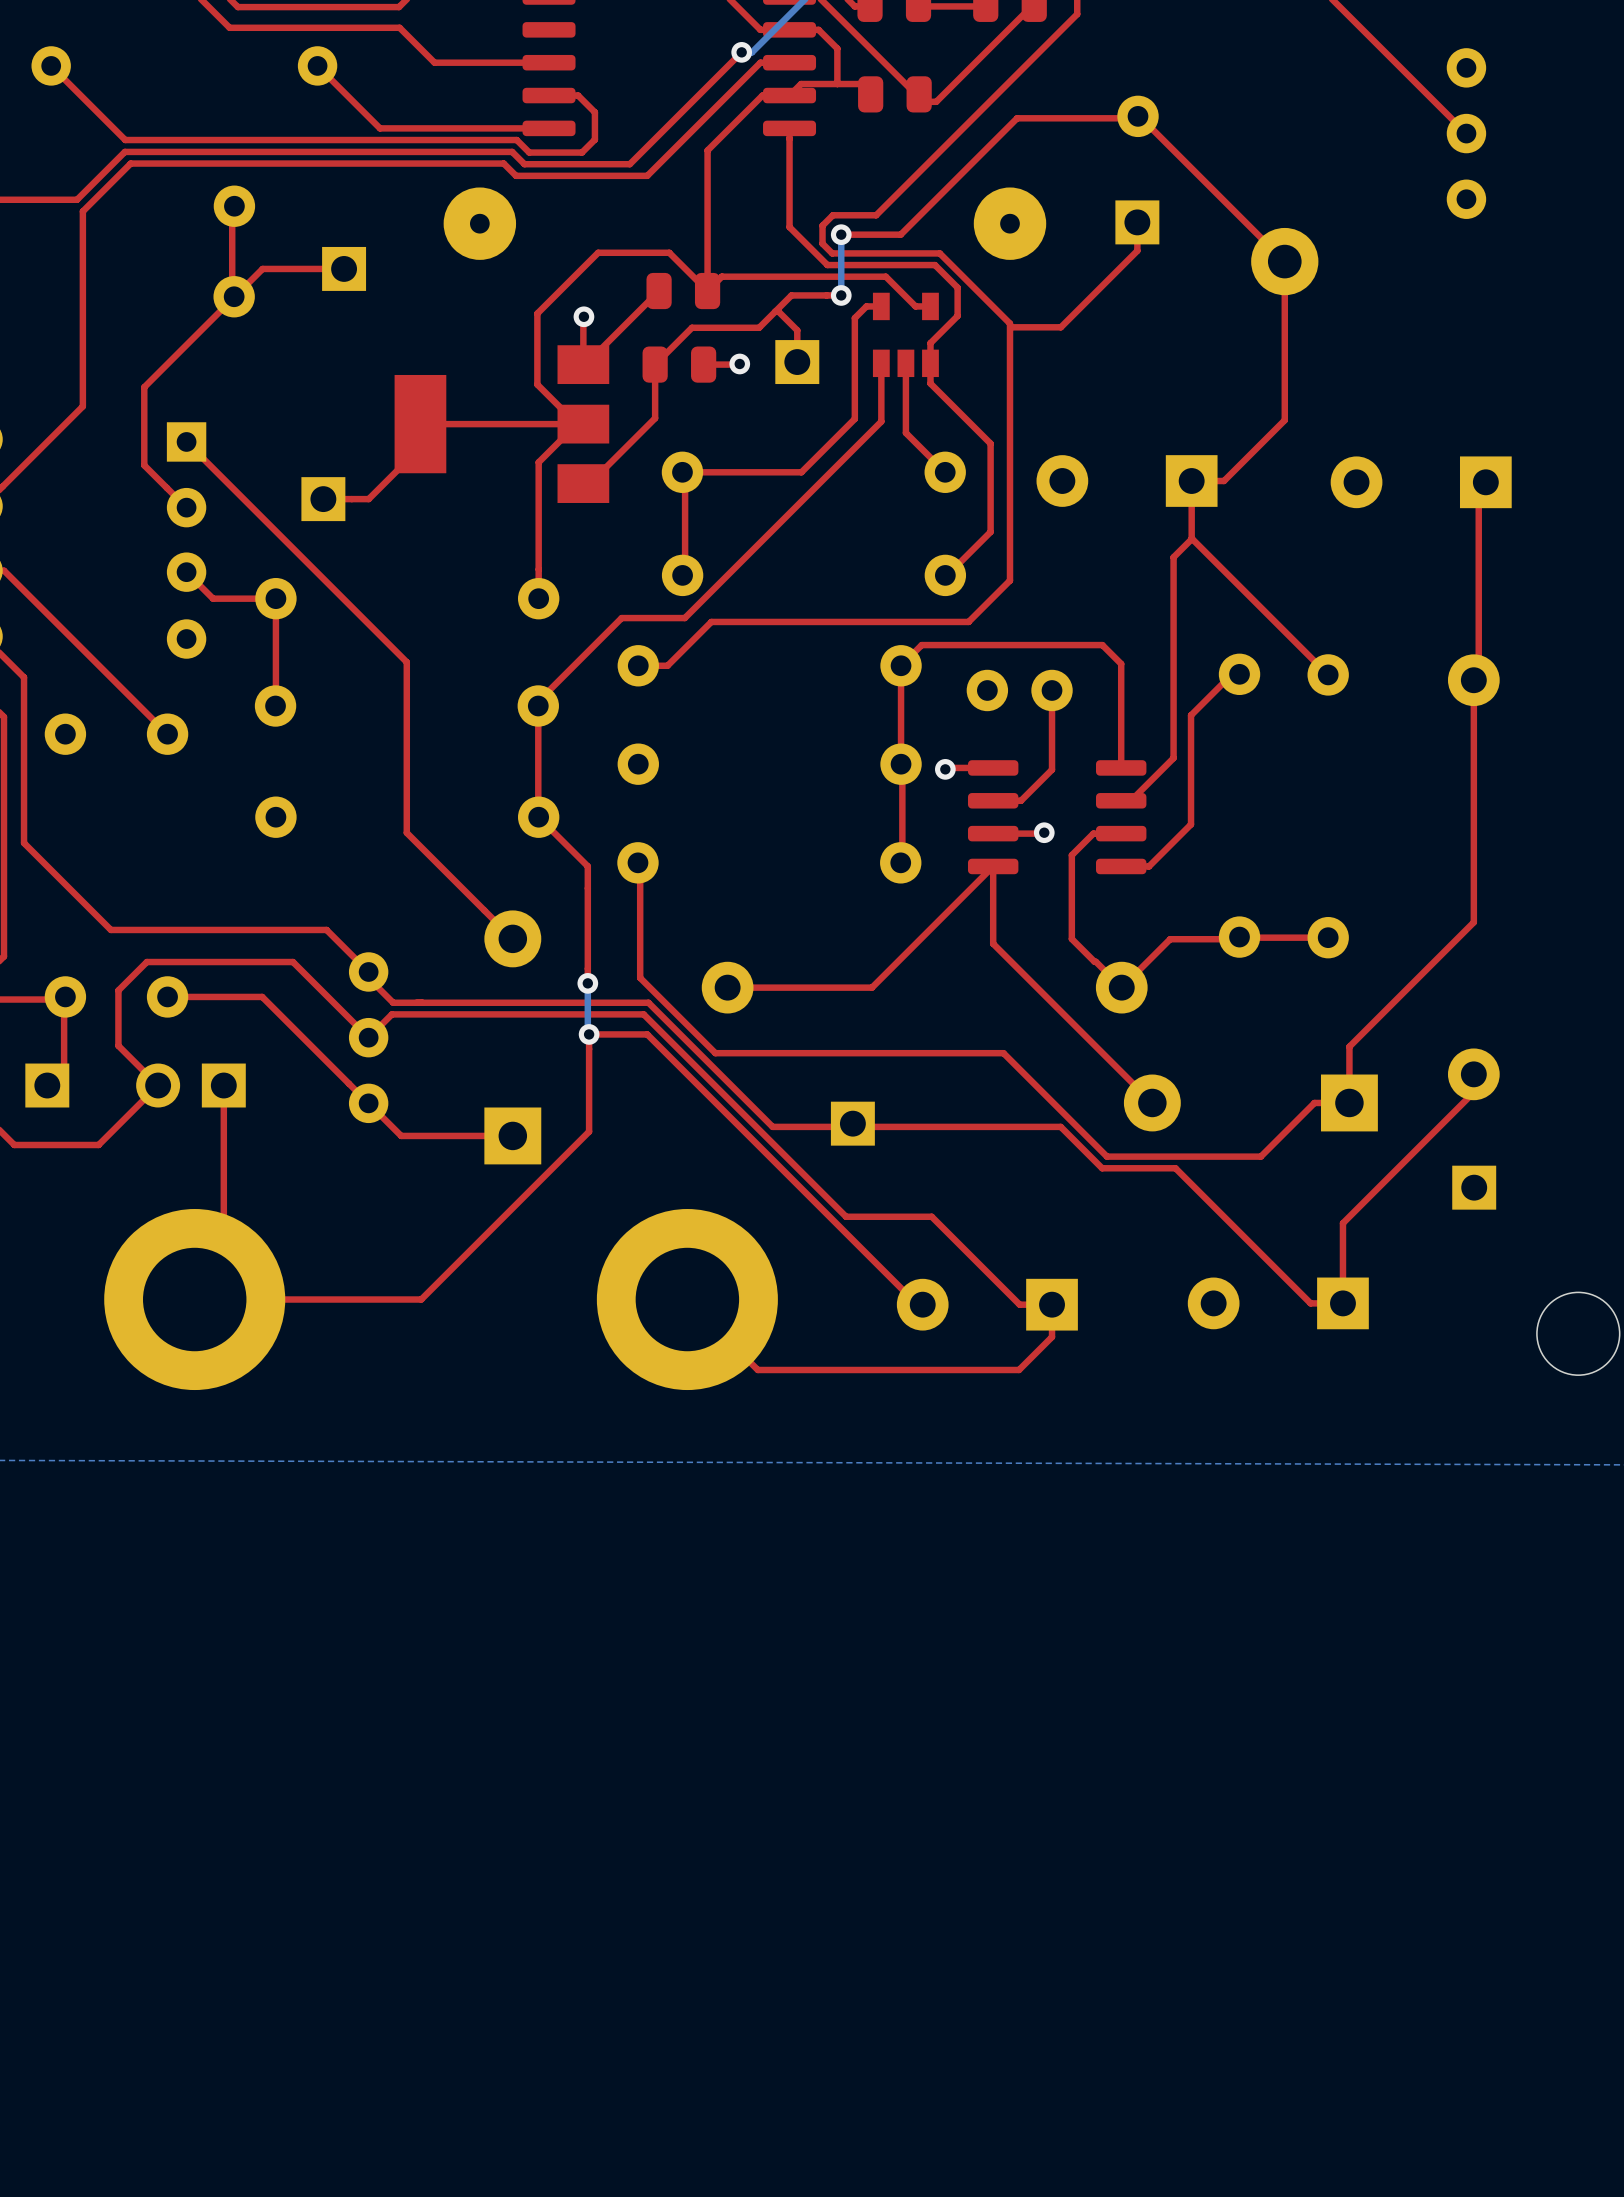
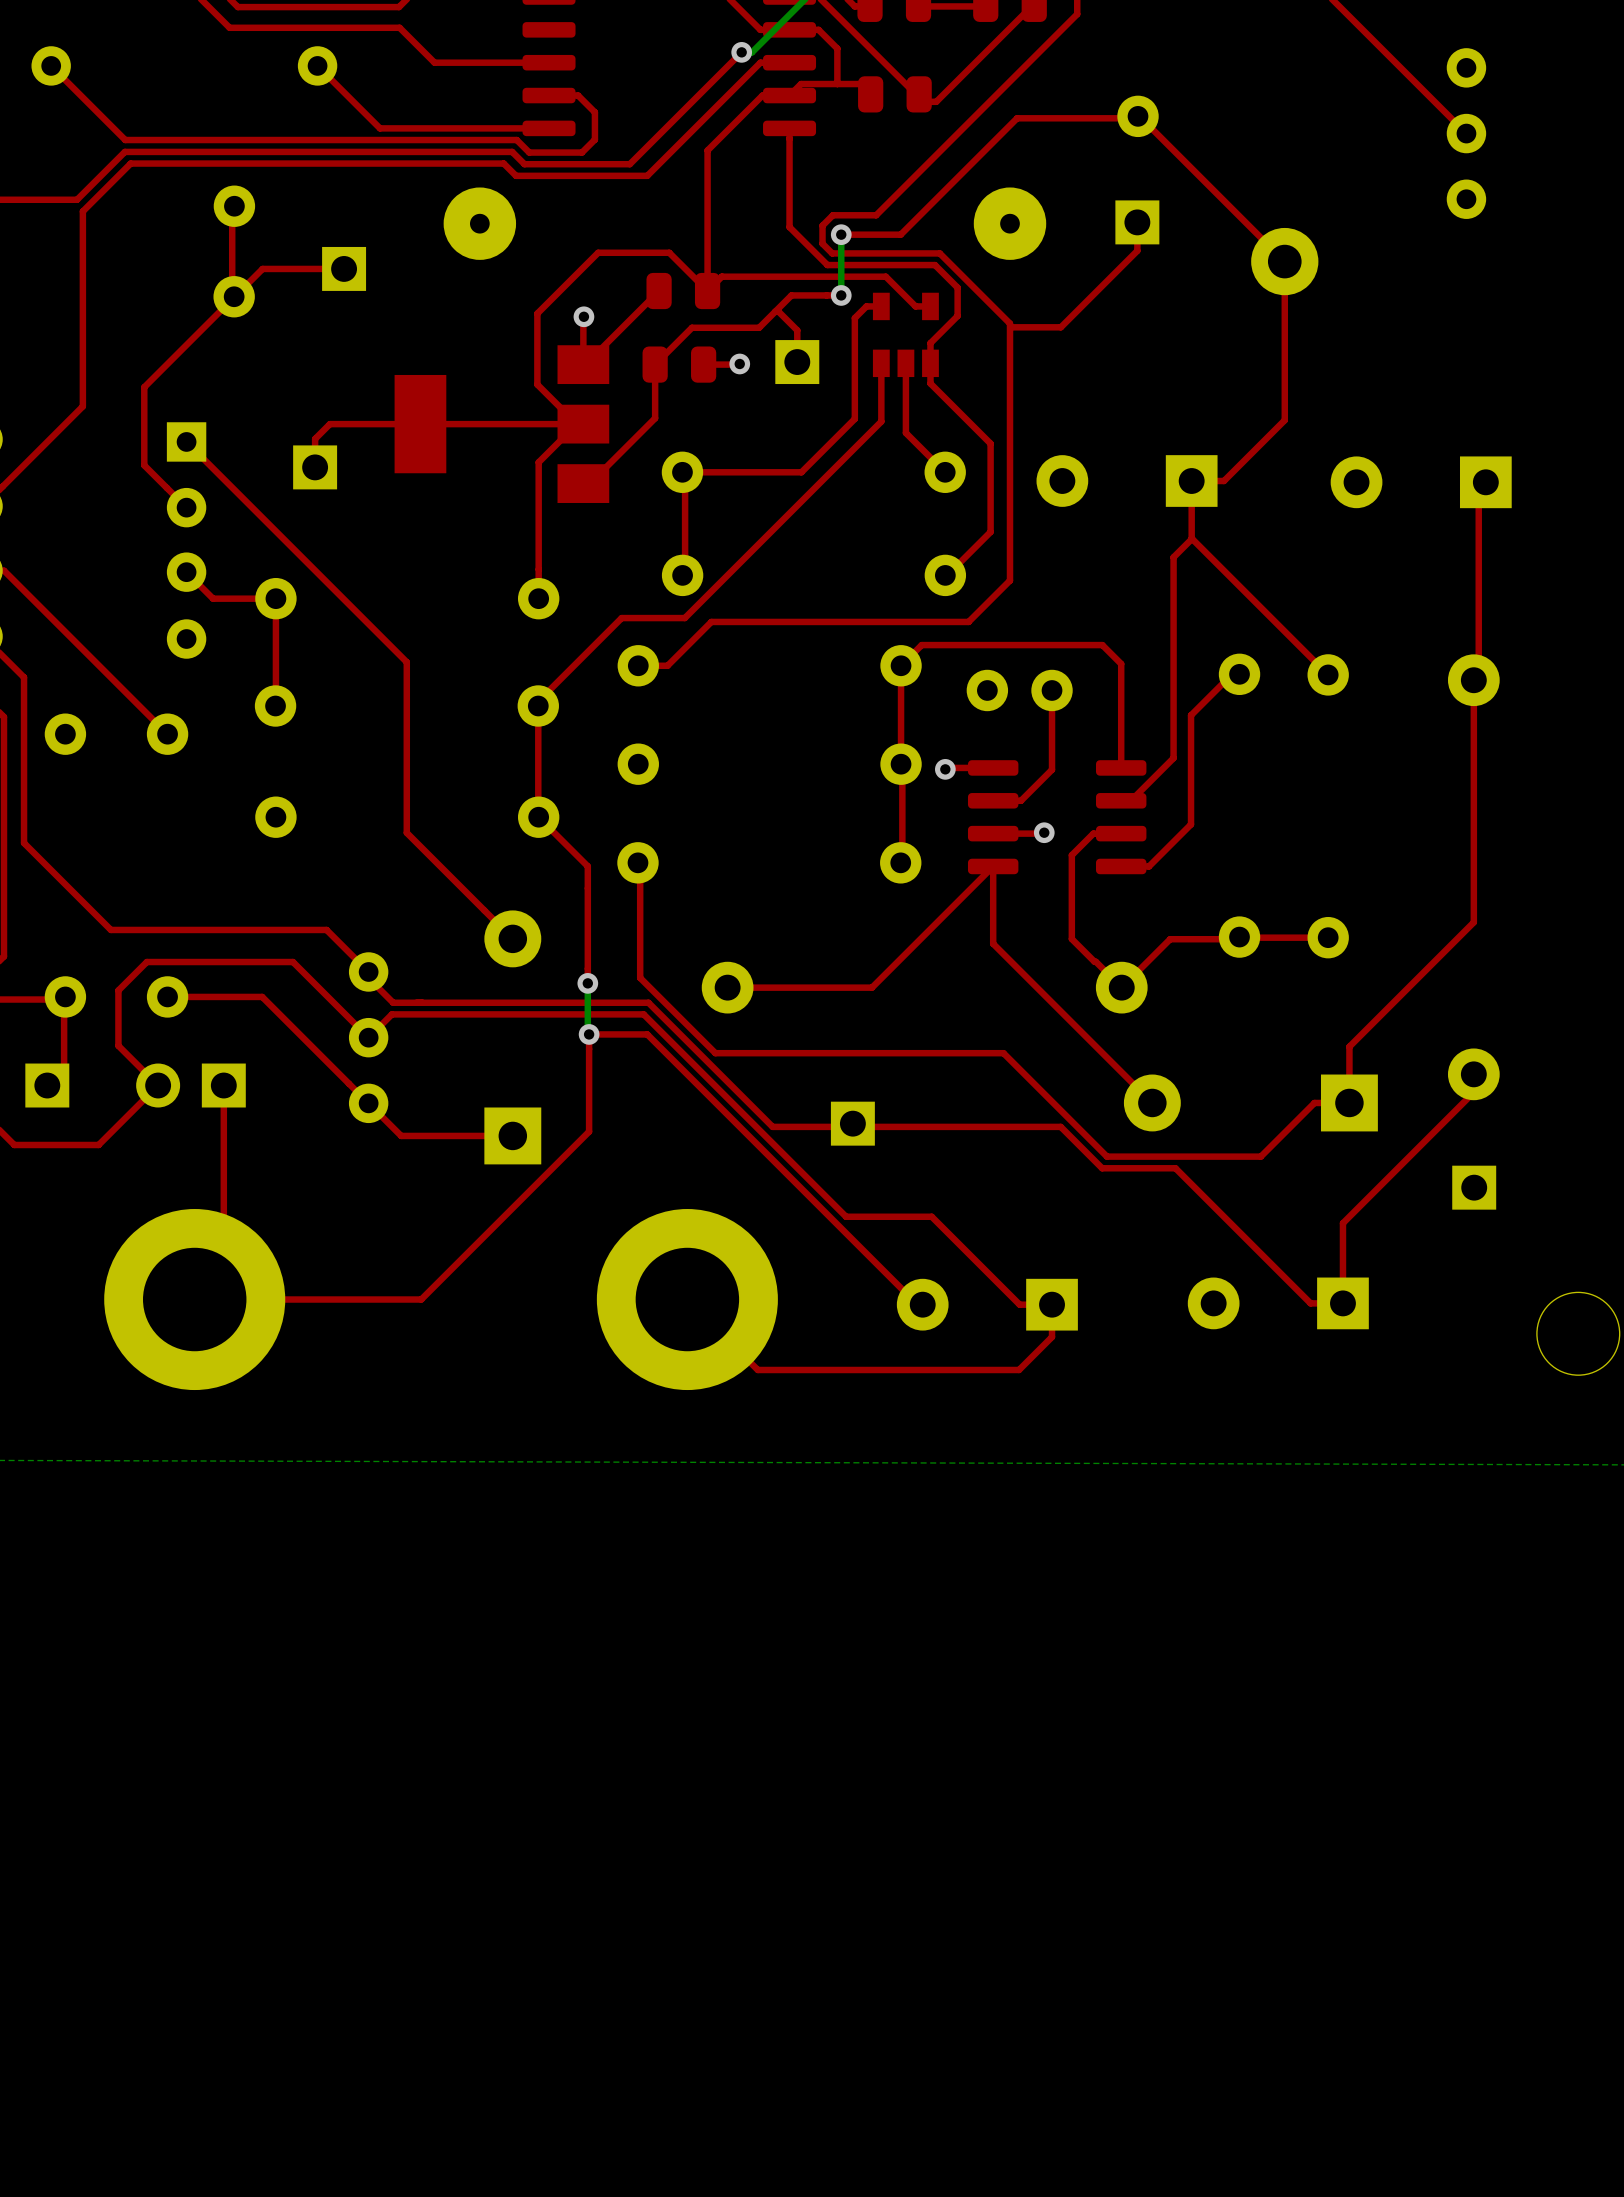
top track: (420, 424) (420, 447) (368, 499) (323, 499) -> (420, 424) (329, 424) (315, 438) (315, 467)
part position: (323, 499) -> (315, 467)

